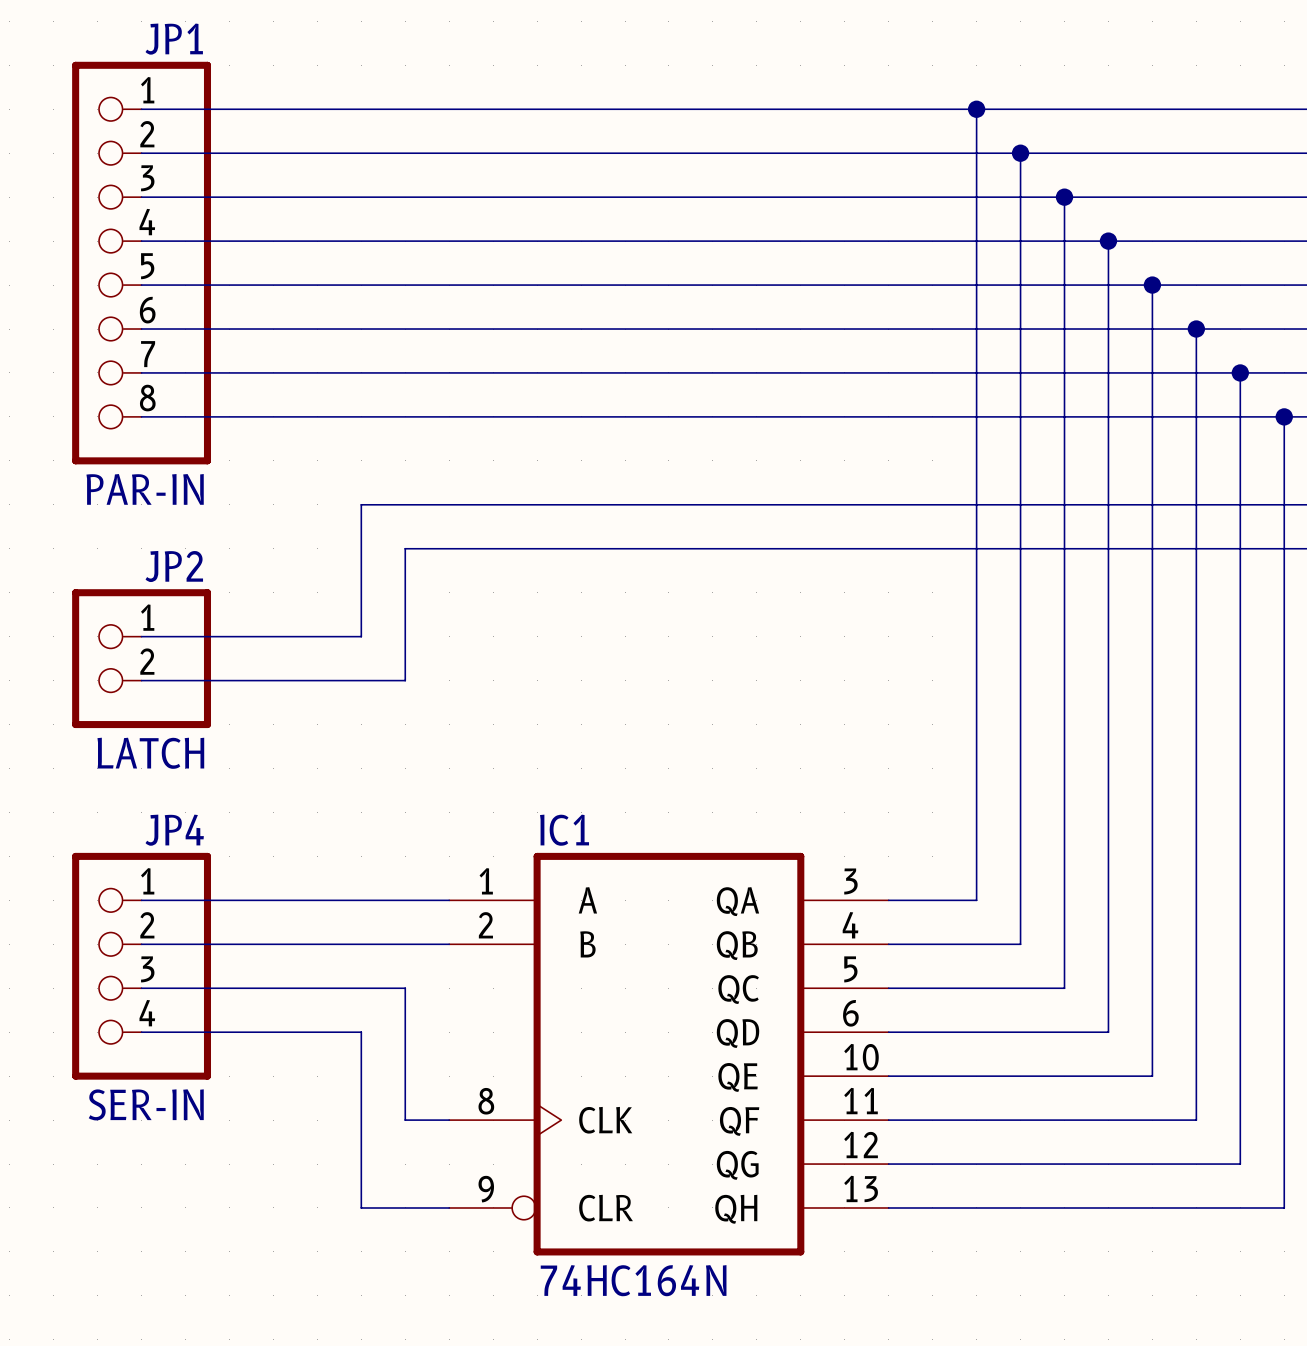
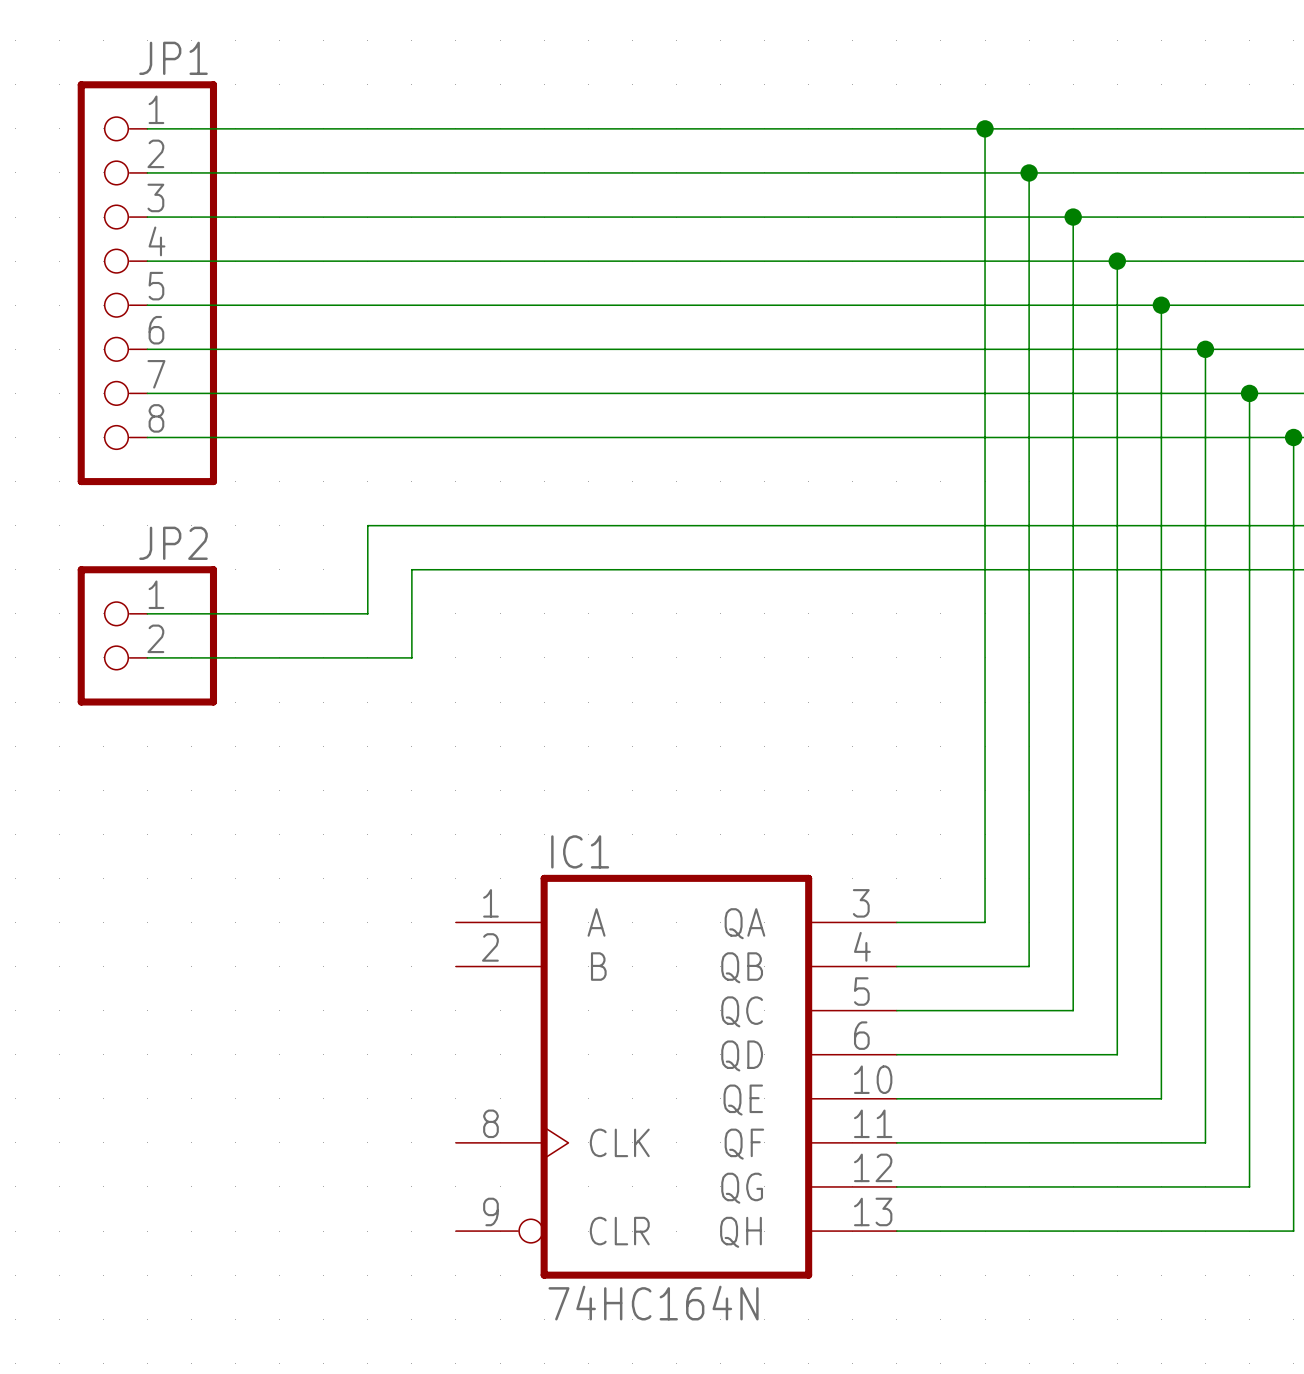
JP1 value: PAR-IN (145, 489) -> none
wire: none -> (147, 613) (367, 613)
wire: (361, 592) (361, 636) -> (411, 657) (367, 657)
wire: (405, 636) (405, 680) (141, 680) -> none
JP2 position: (141, 658) -> (147, 635)
JP2 value: LATCH (150, 753) -> none
wire: (141, 900) (449, 900) -> none
wire: (141, 944) (449, 944) -> none
JP4: SER-IN (141, 966) -> none
wire: (141, 988) (405, 988) (405, 1120) (449, 1120) -> none
wire: (141, 1032) (361, 1032) (361, 1207) (449, 1207) -> none

